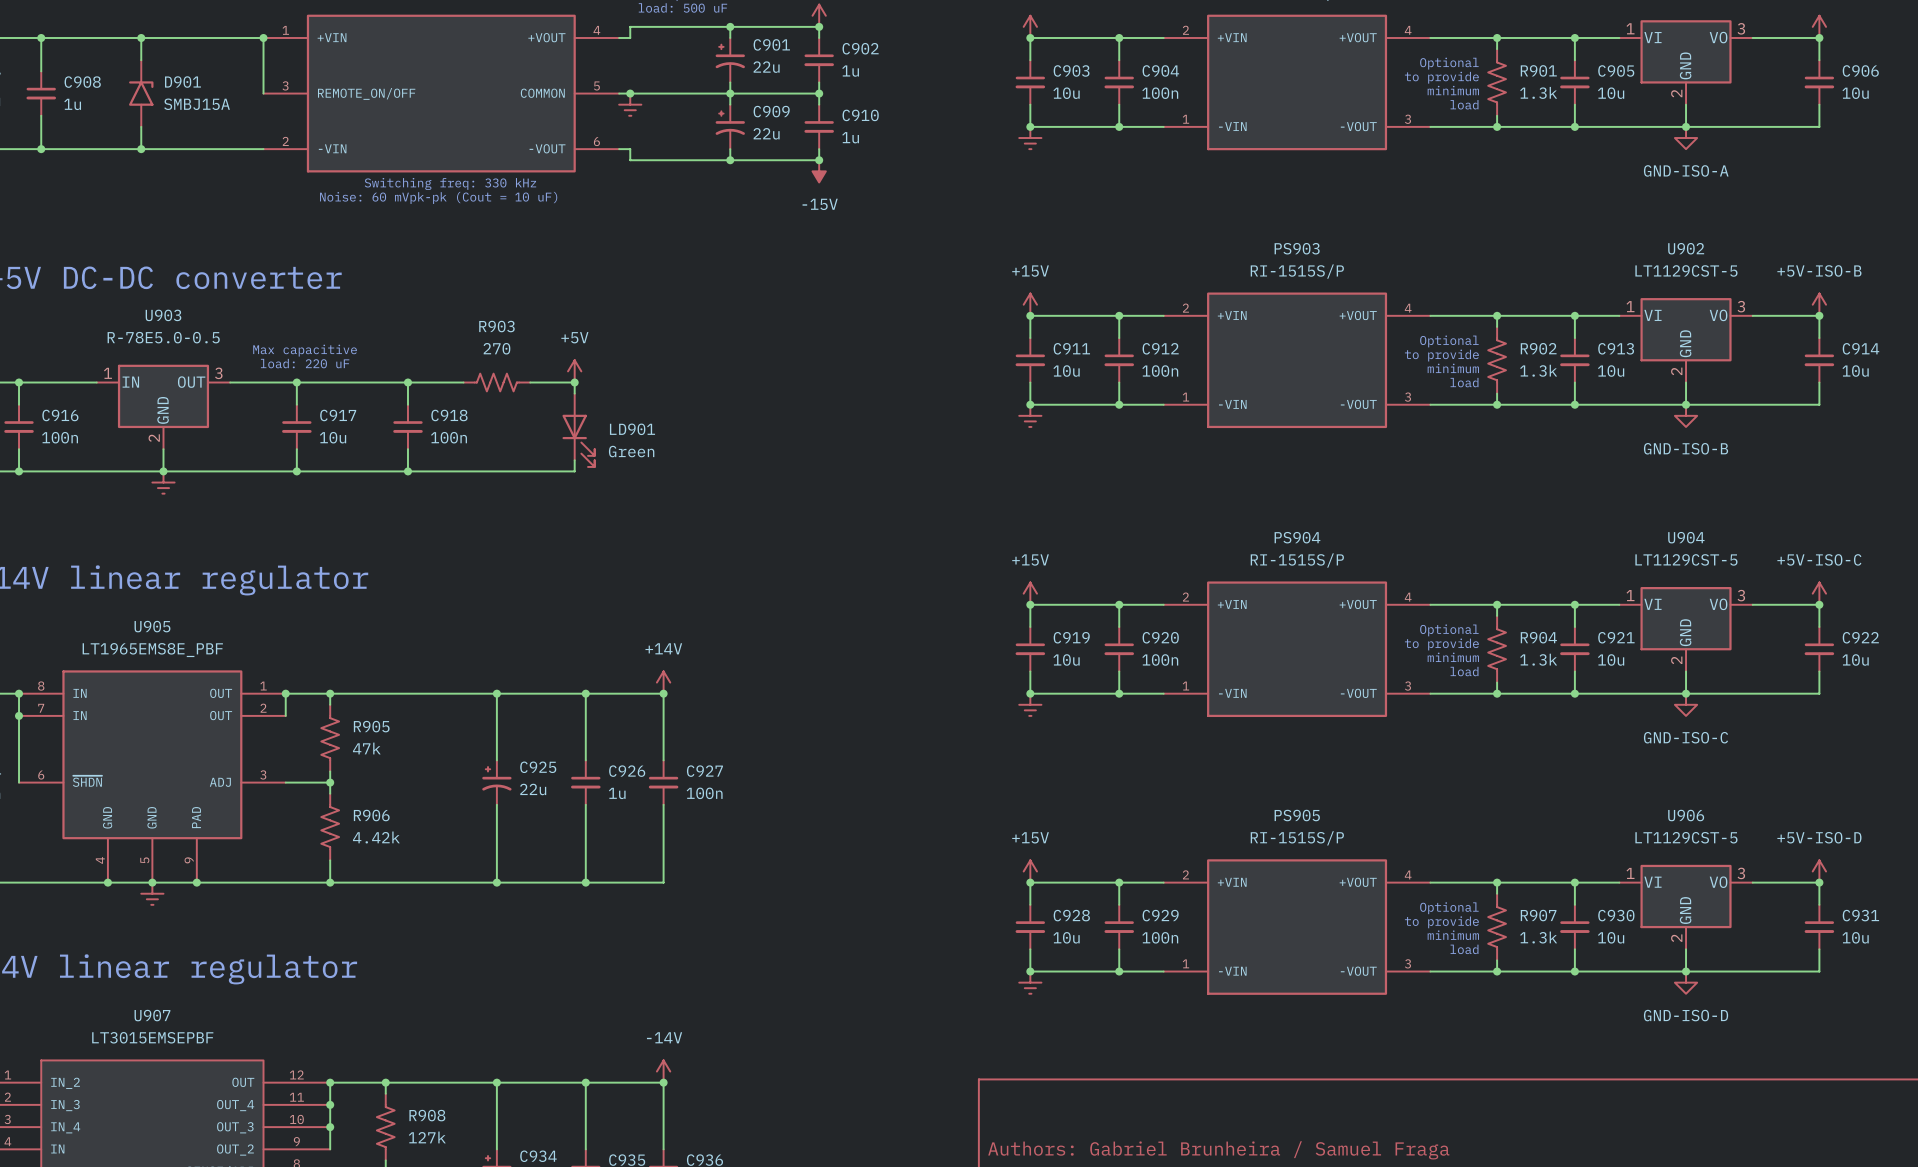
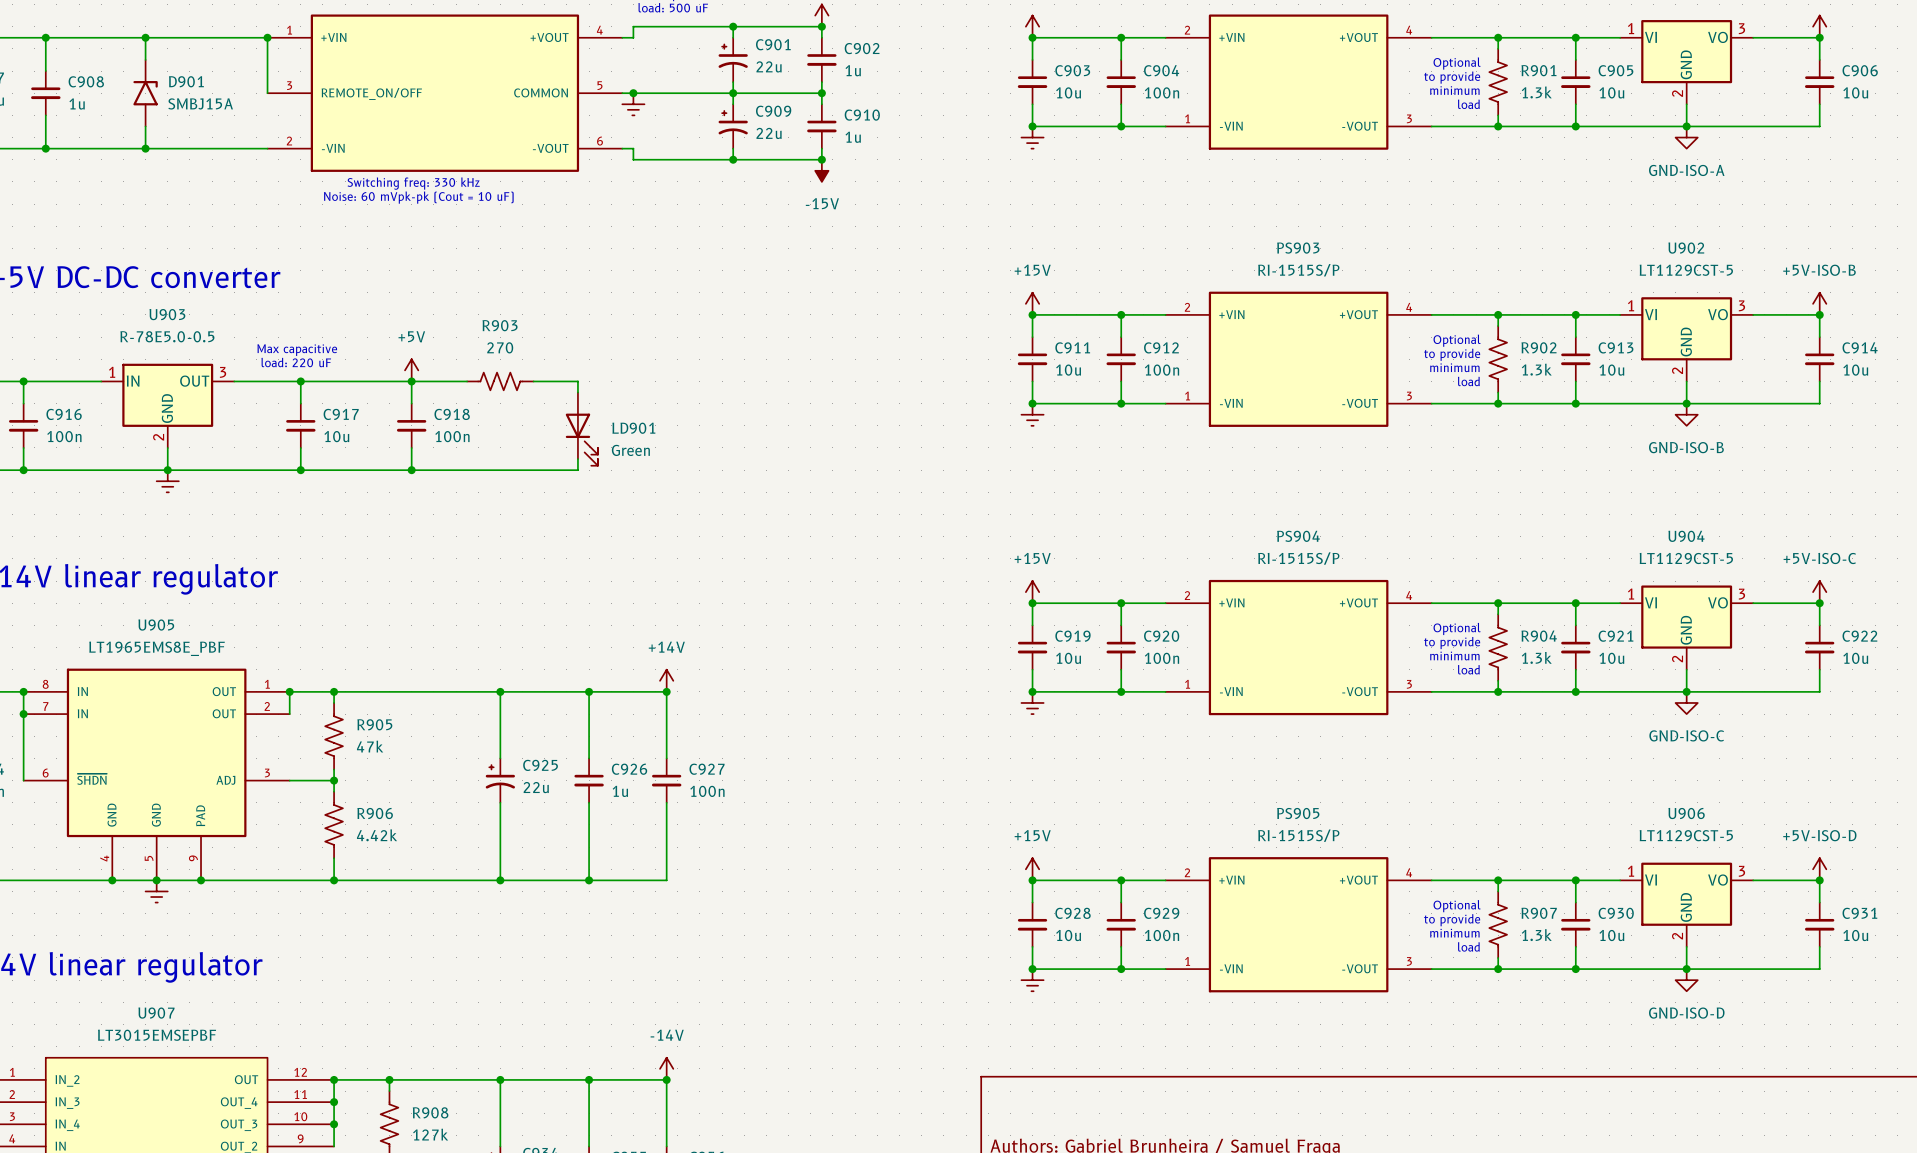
power symbol position: +5V (574, 371) -> +5V (411, 370)
junction: (574, 382) -> none

